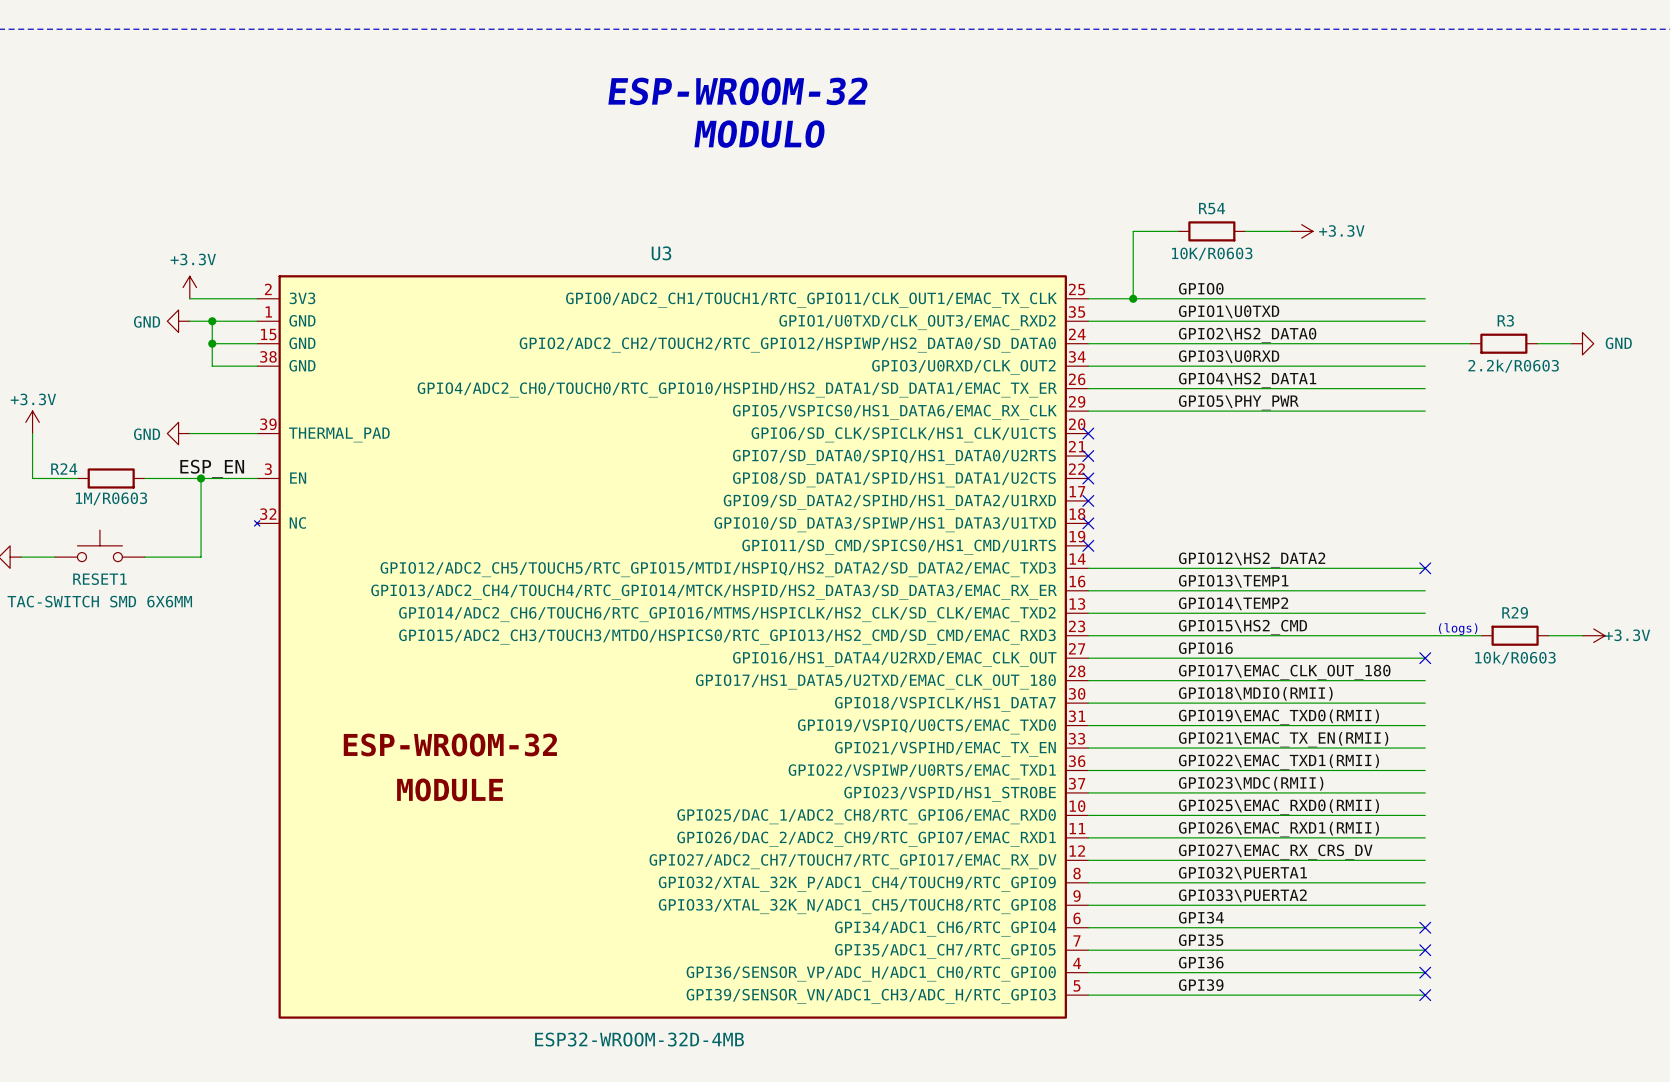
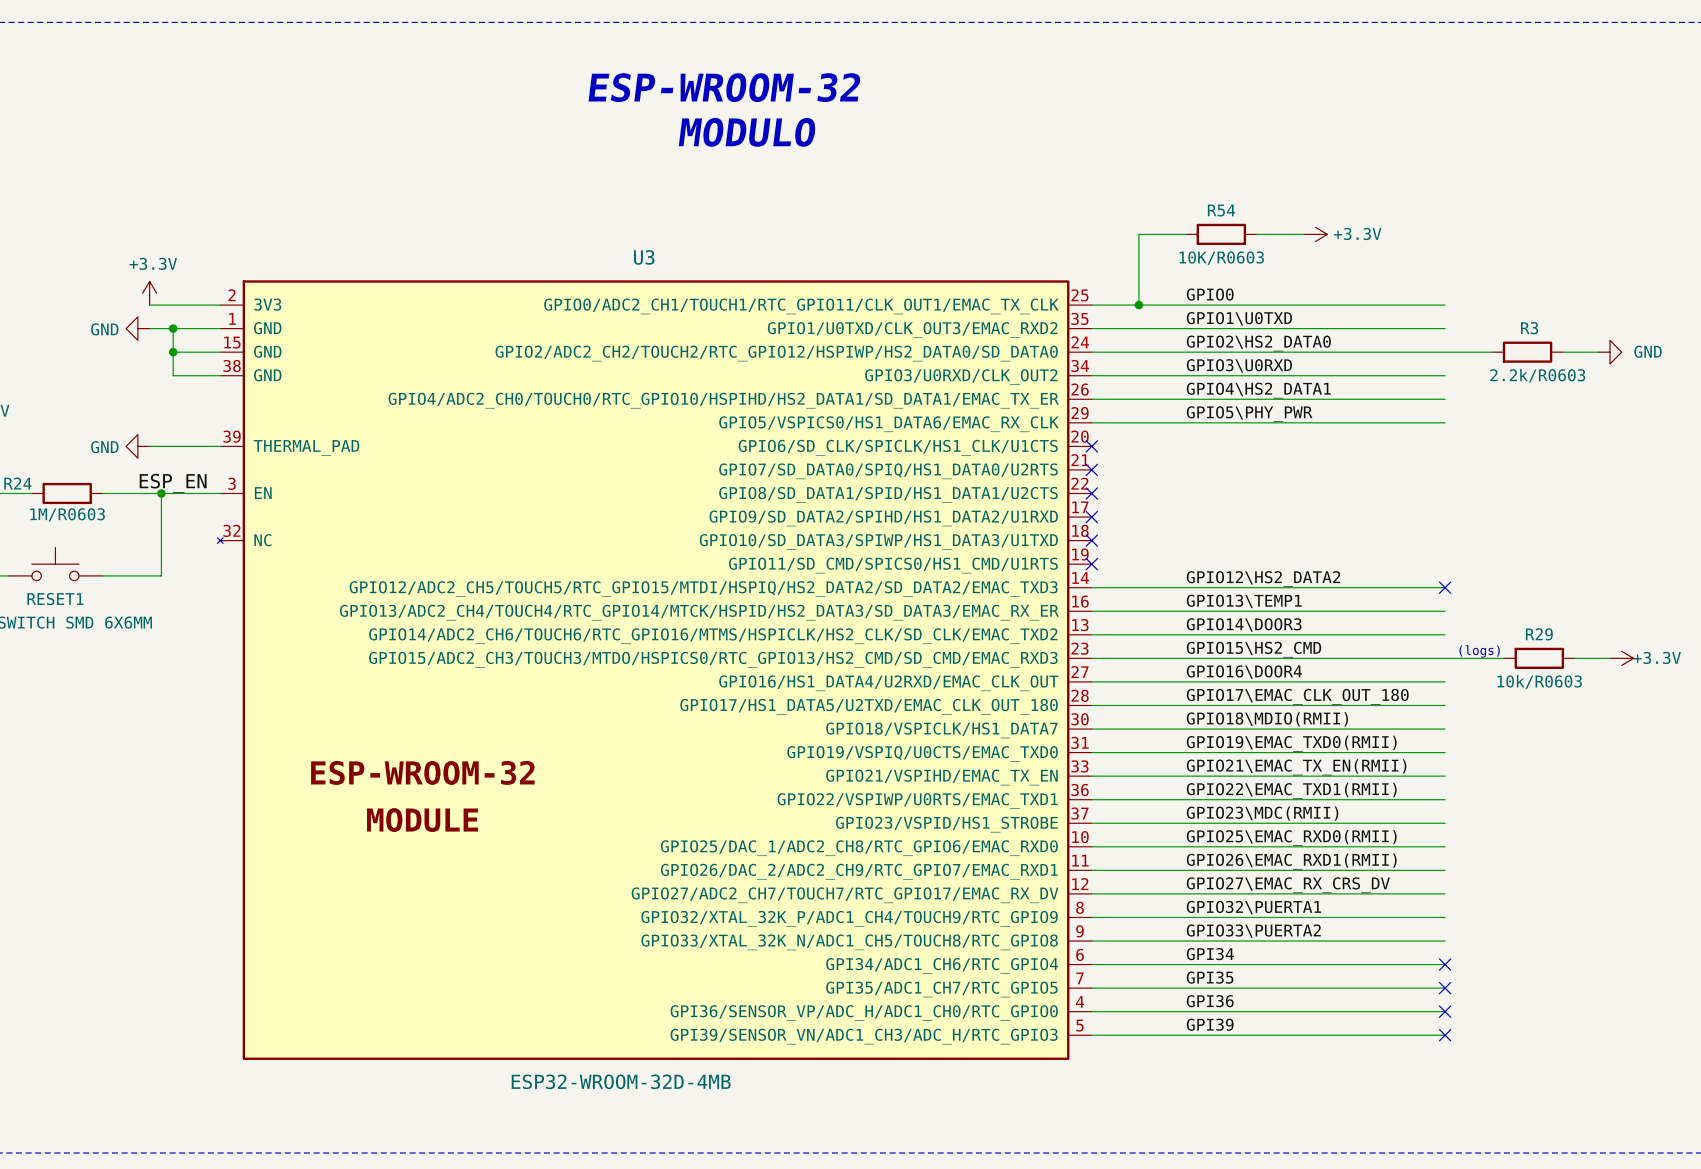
label: GPIO14\TEMP2 (1233, 603) -> GPIO14\DOOR3 (1244, 624)
label: GPIO16 (1205, 648) -> GPIO16\DOOR4 (1244, 672)
no-connect mark: (1425, 658) -> none

